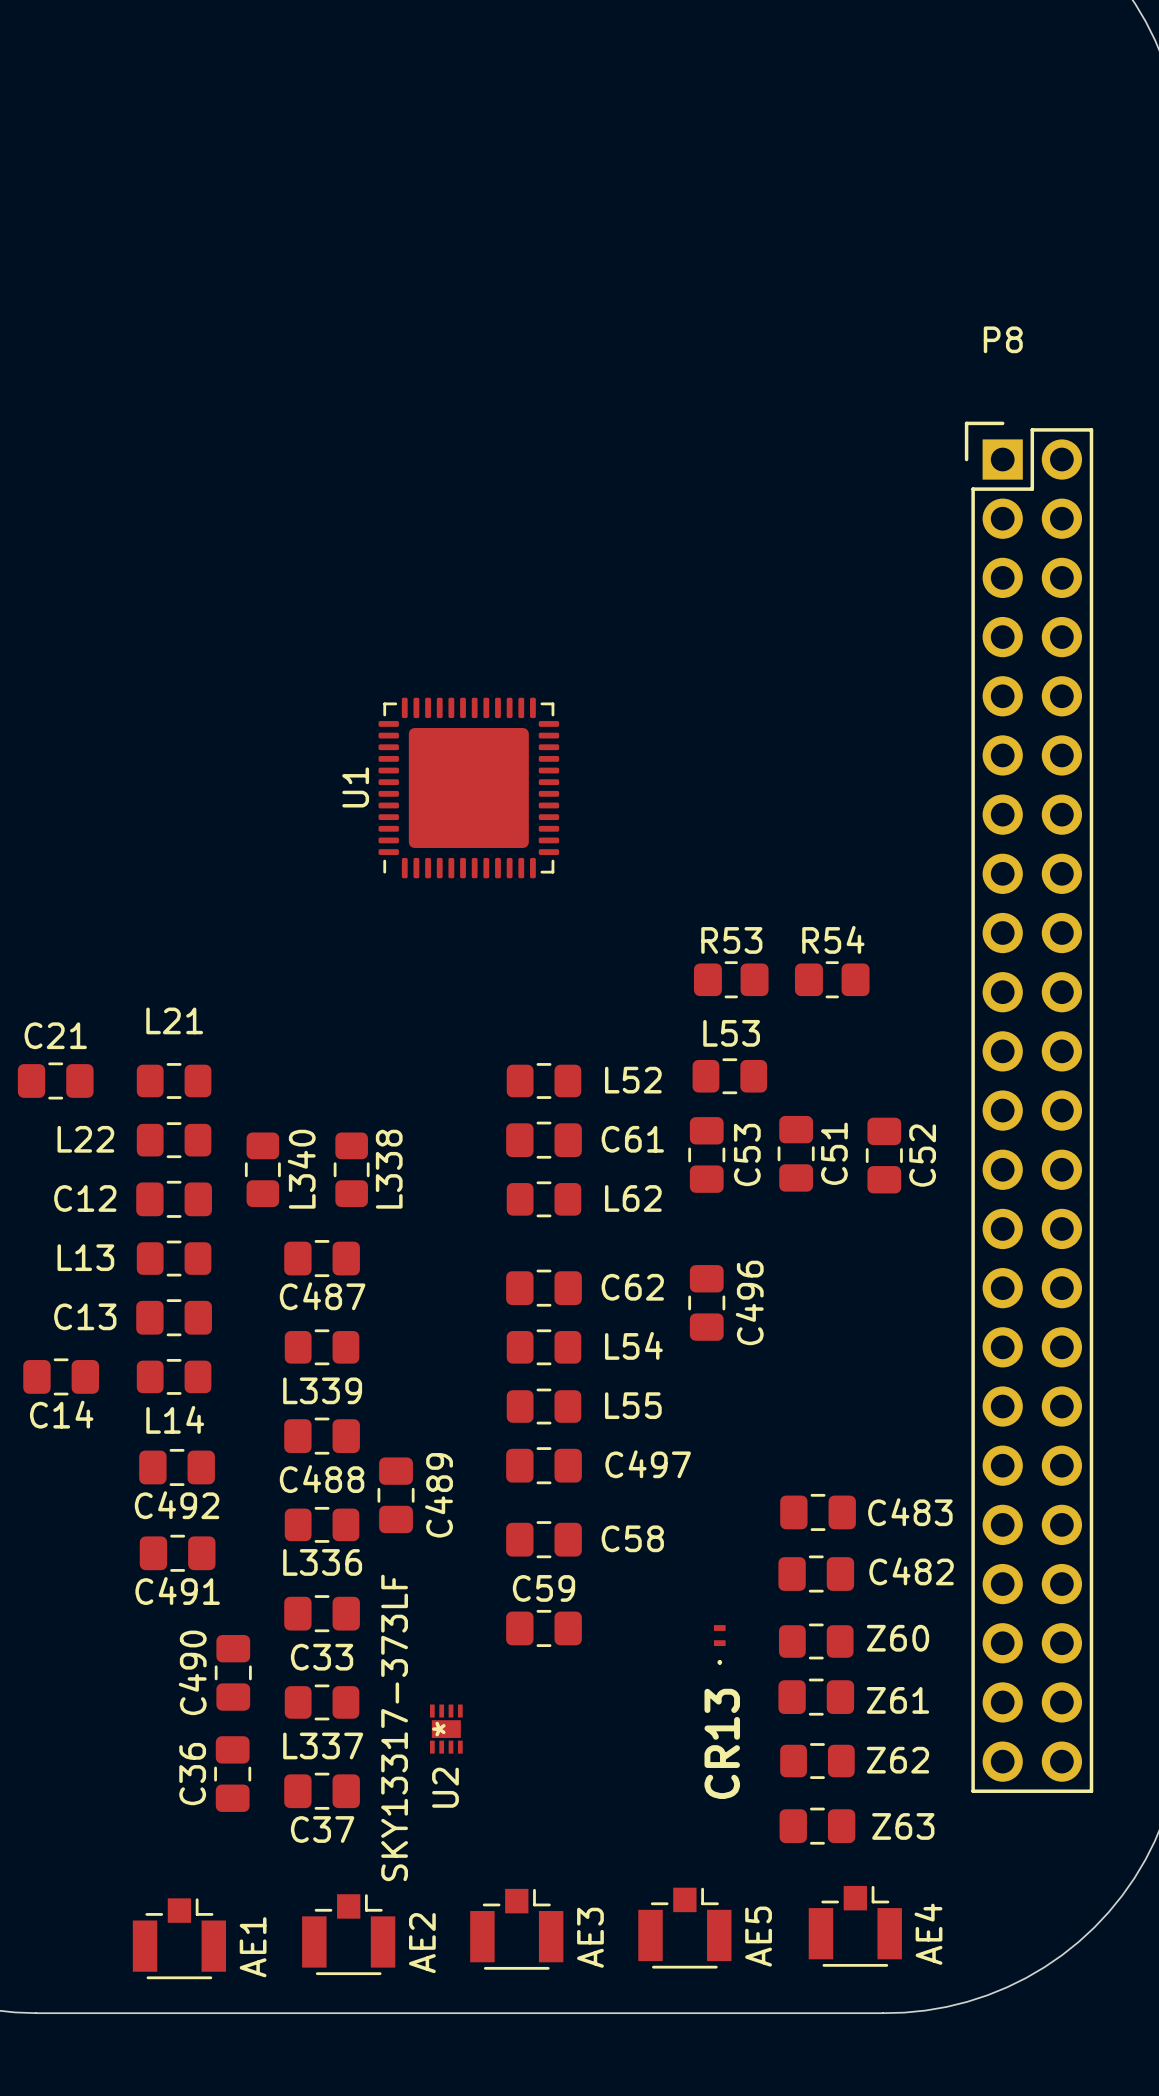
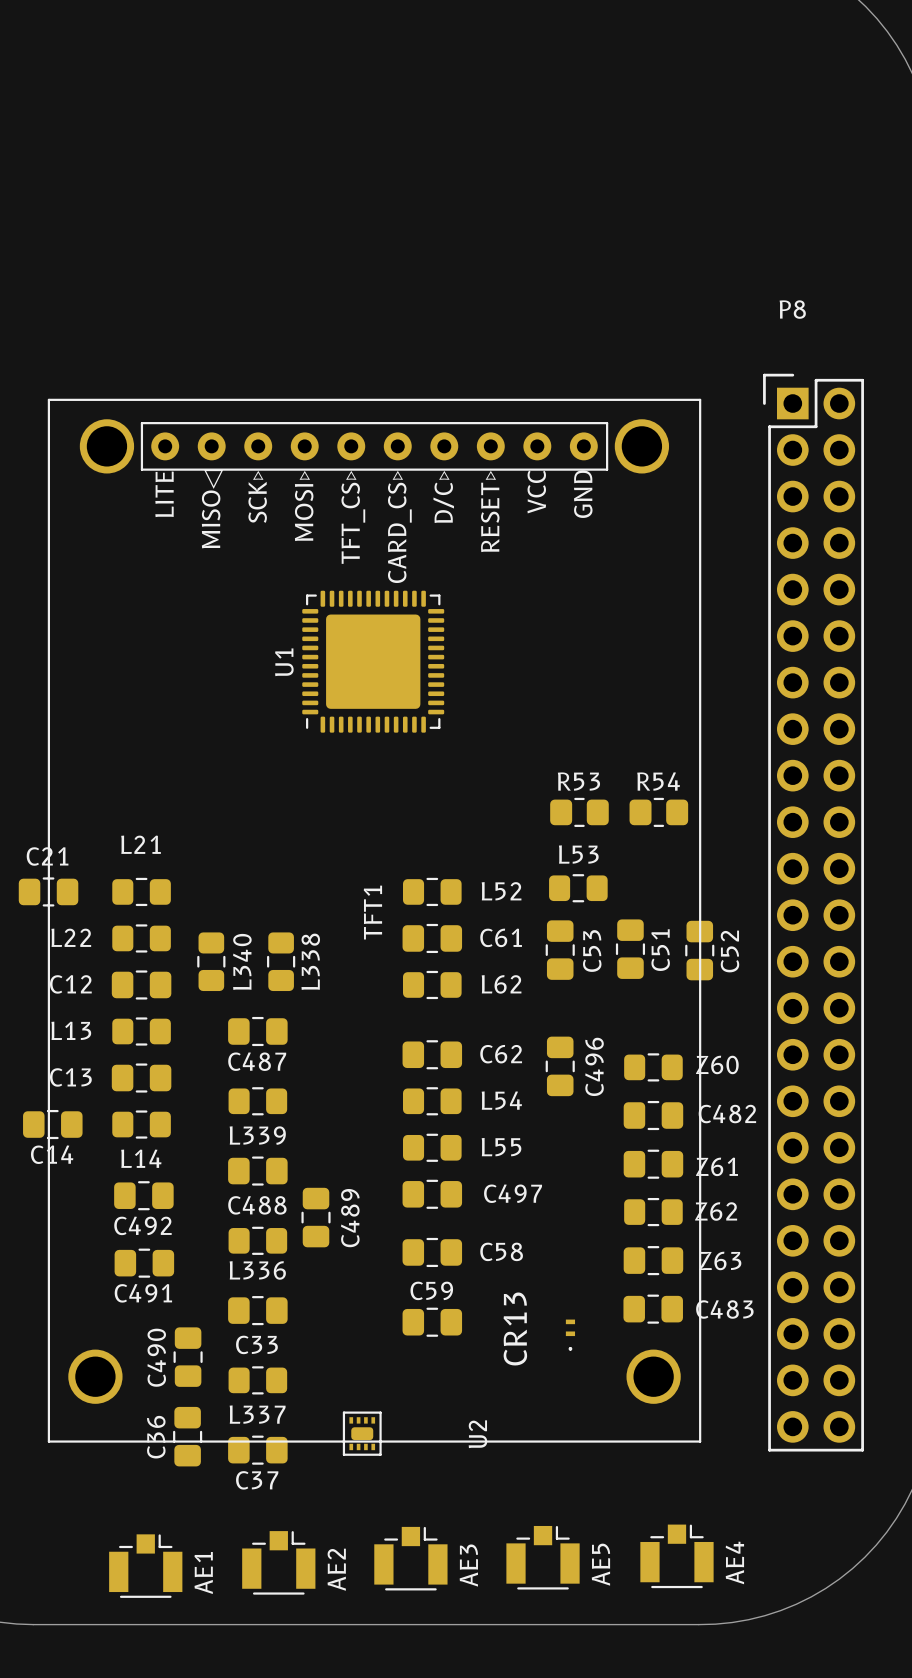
TFT1: none -> (374, 920)
C483 position: (818, 1512) -> (653, 1309)
C482 position: (816, 1574) -> (653, 1115)
Z60 position: (816, 1641) -> (653, 1067)
Z61 position: (816, 1697) -> (653, 1164)
U2 footprint: [430, 1704, 463, 1754] -> [342, 1411, 382, 1456]
U2 value: SKY13317-373LF (394, 1727) -> none
CR13 name position: CR13 (722, 1743) -> CR13 (515, 1328)
Z62 position: (817, 1761) -> (653, 1212)
U2 name position: U2 (445, 1787) -> U2 (477, 1434)
Z63 position: (817, 1826) -> (653, 1260)

